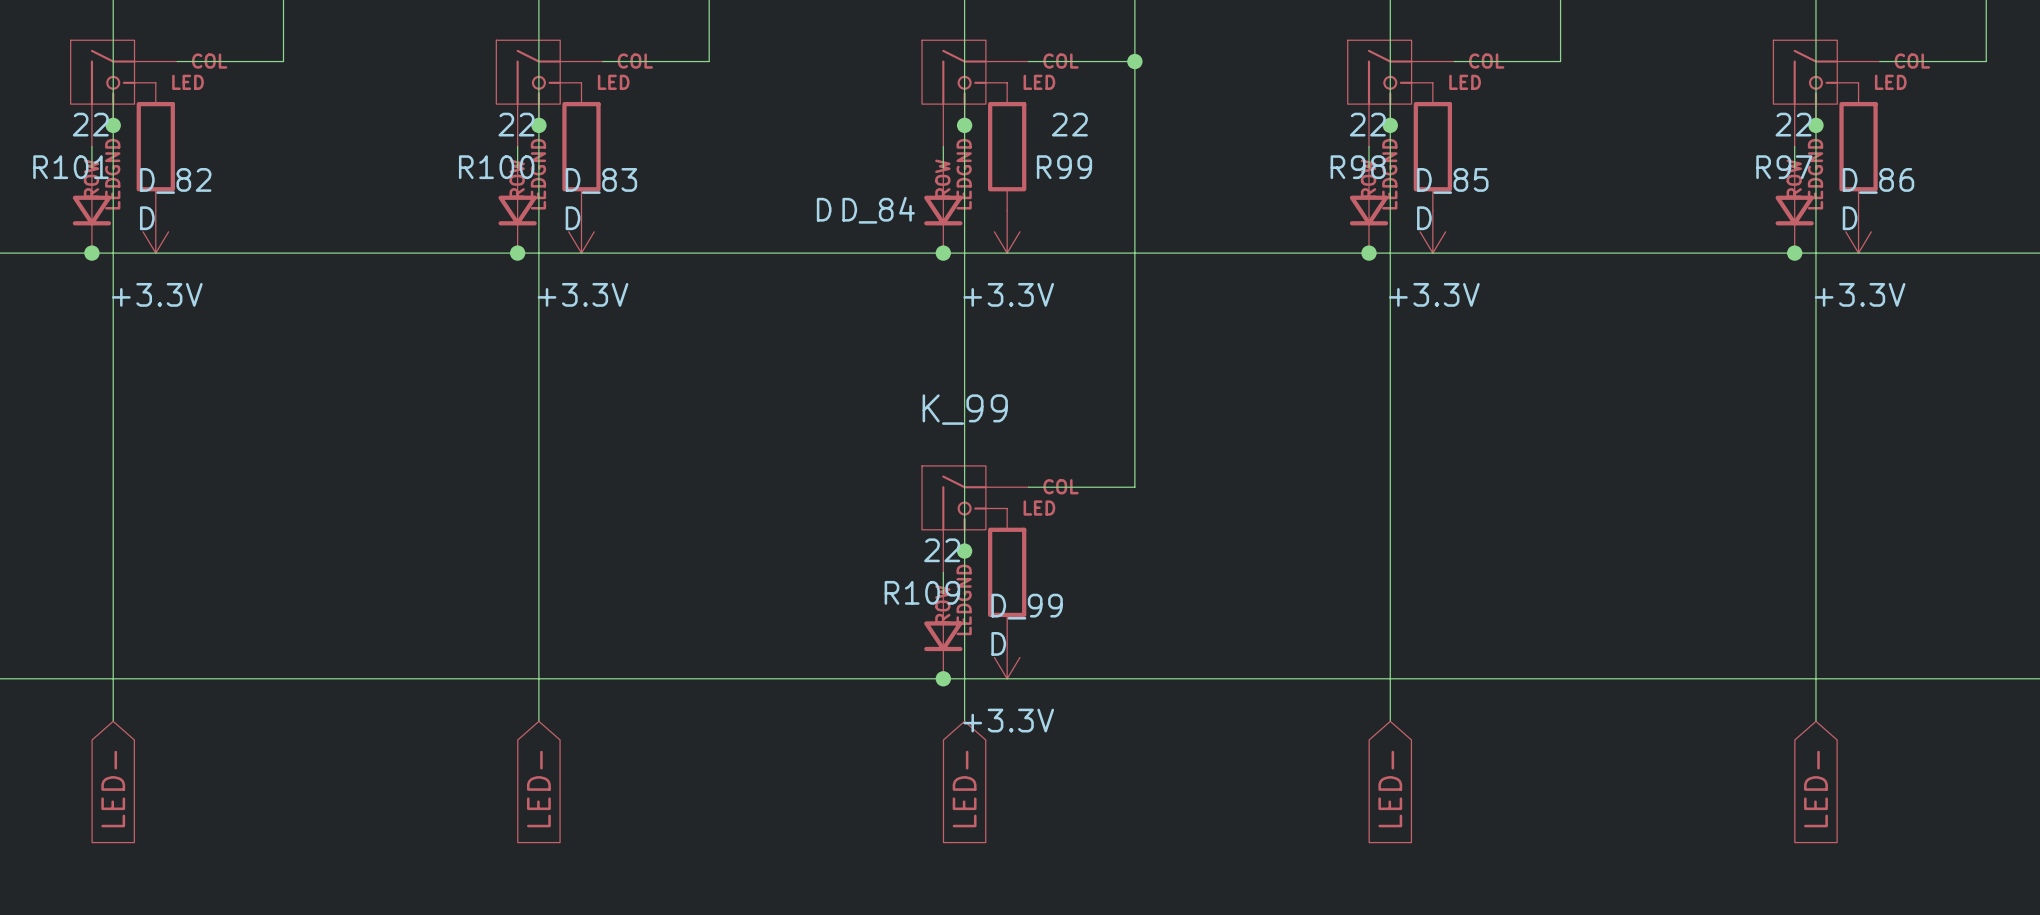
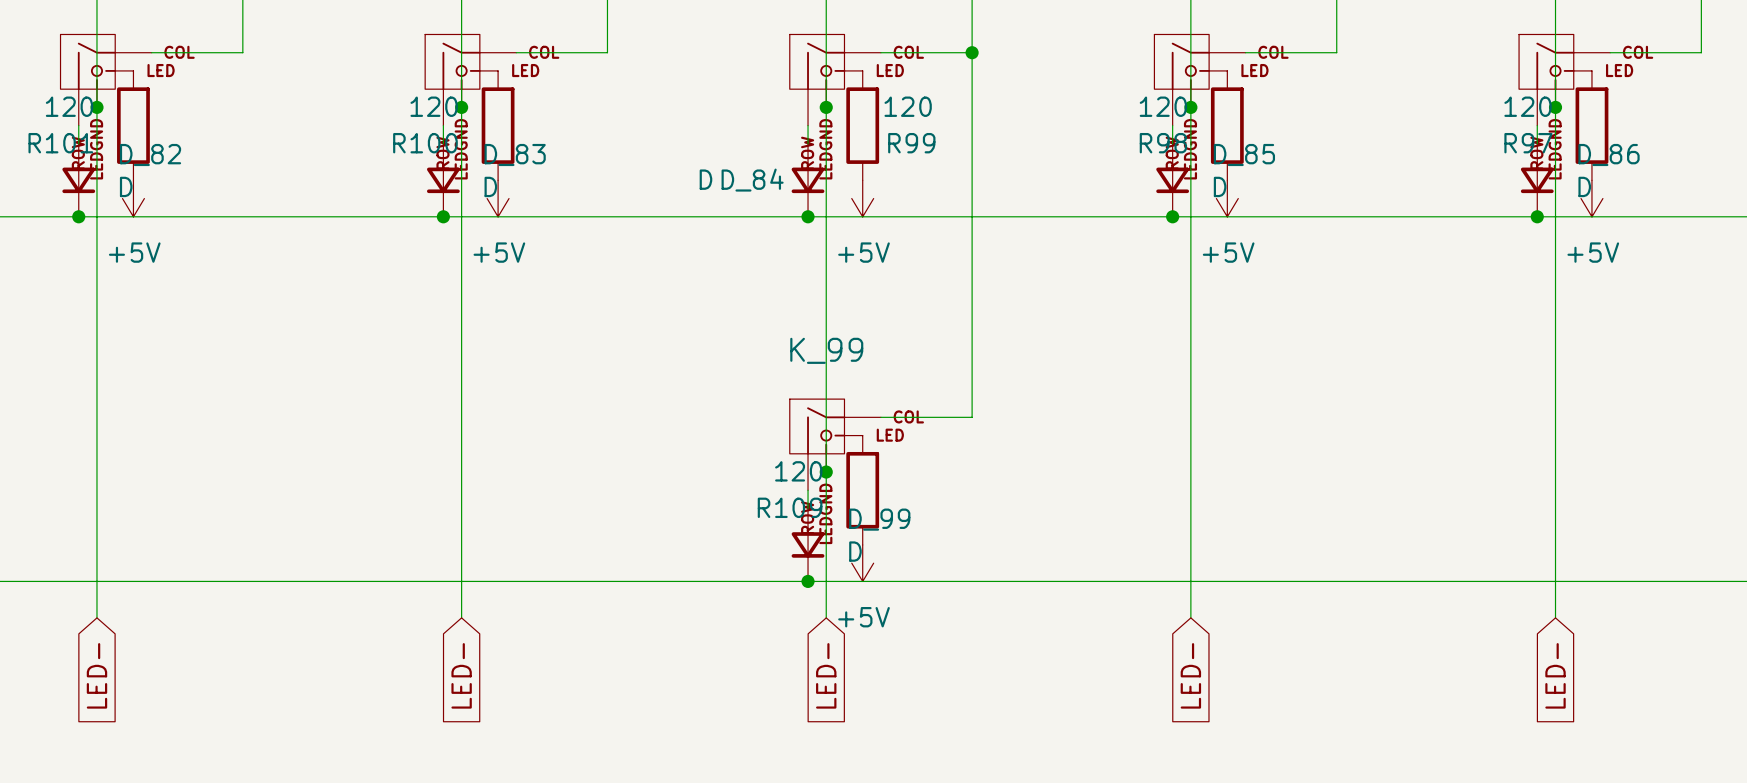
R101 value: 22 (90, 124) -> 120 (69, 106)
R100 value: 22 (516, 124) -> 120 (434, 106)
R99 value: 22 (1069, 124) -> 120 (908, 106)
R98 value: 22 (1367, 124) -> 120 (1163, 106)
R97 value: 22 (1793, 124) -> 120 (1528, 106)
power symbol: +3.3V (155, 231) -> +5V (133, 198)
power symbol: +3.3V (581, 231) -> +5V (498, 198)
power symbol: +3.3V (1007, 231) -> +5V (862, 198)
power symbol: +3.3V (1432, 231) -> +5V (1227, 198)
power symbol: +3.3V (1858, 231) -> +5V (1591, 198)
R109 value: 22 (942, 550) -> 120 (798, 471)
power symbol: +3.3V (1007, 657) -> +5V (862, 563)

